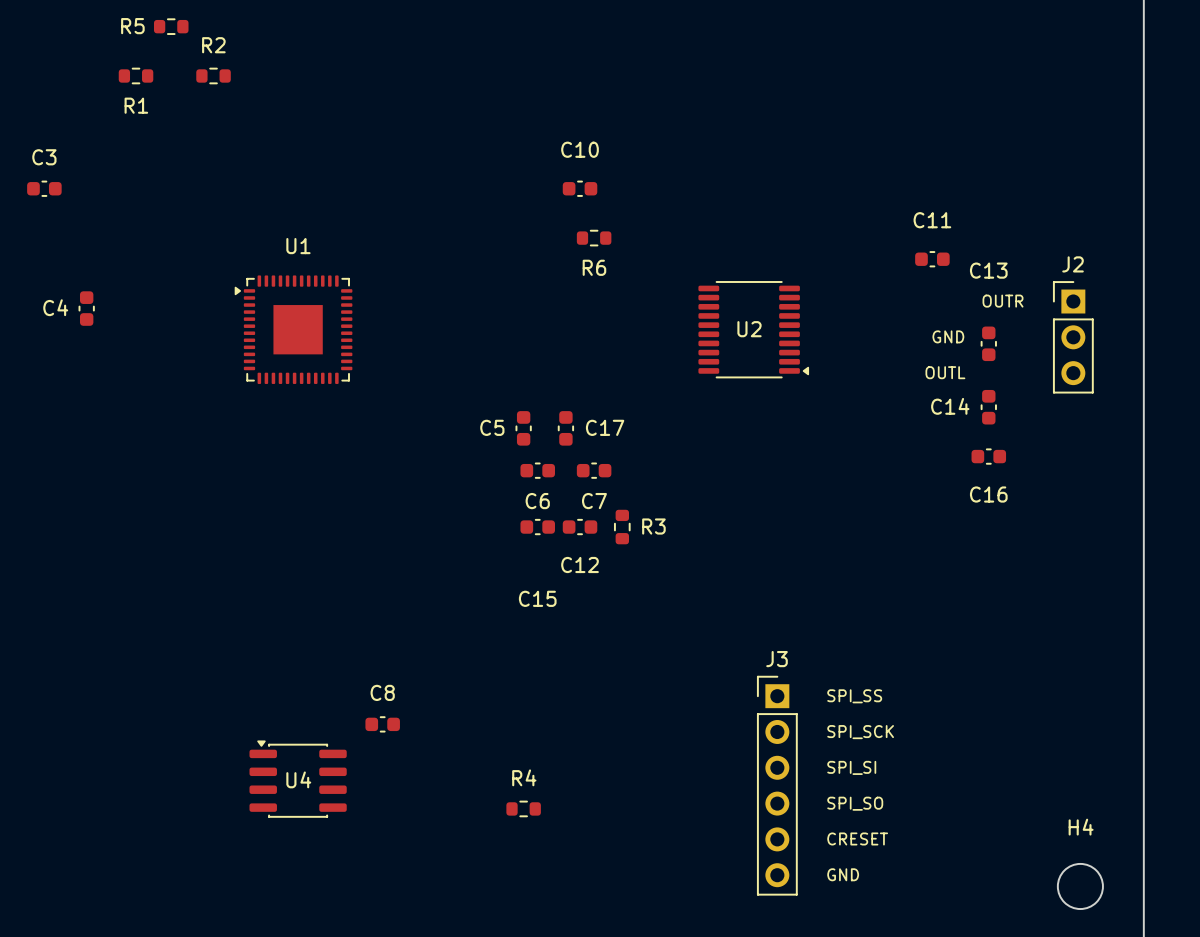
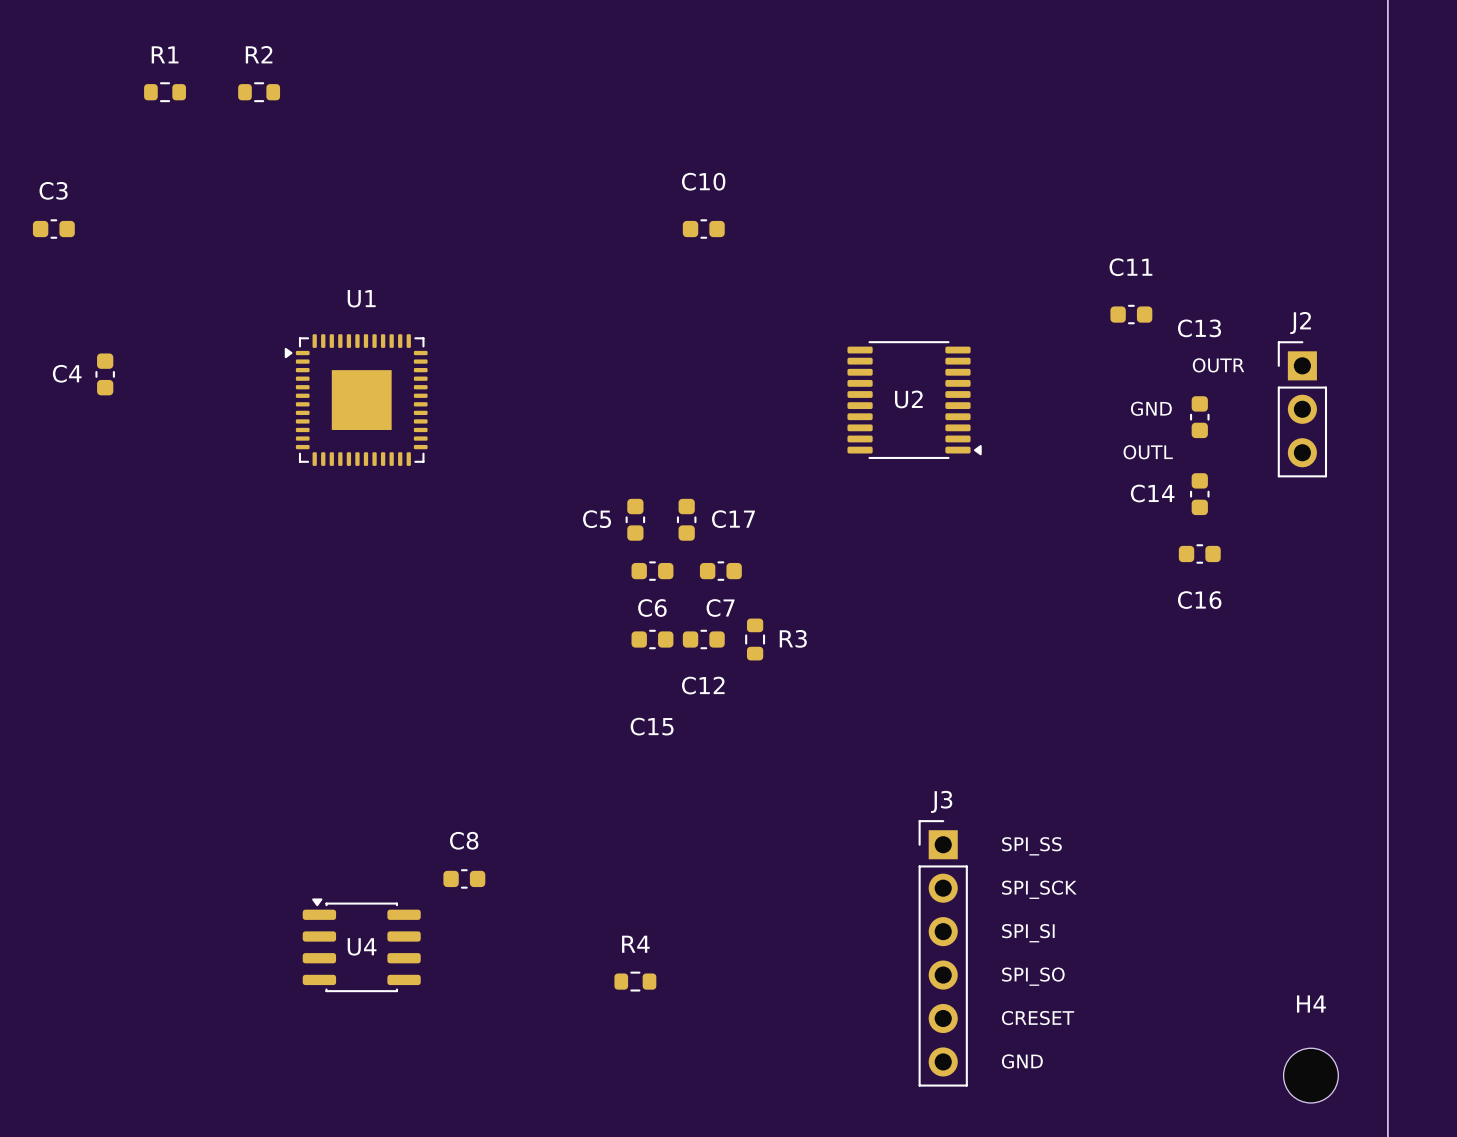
R5: (171, 26) -> none
R1 name position: R1 (136, 105) -> R1 (165, 54)
R6: (594, 238) -> none

